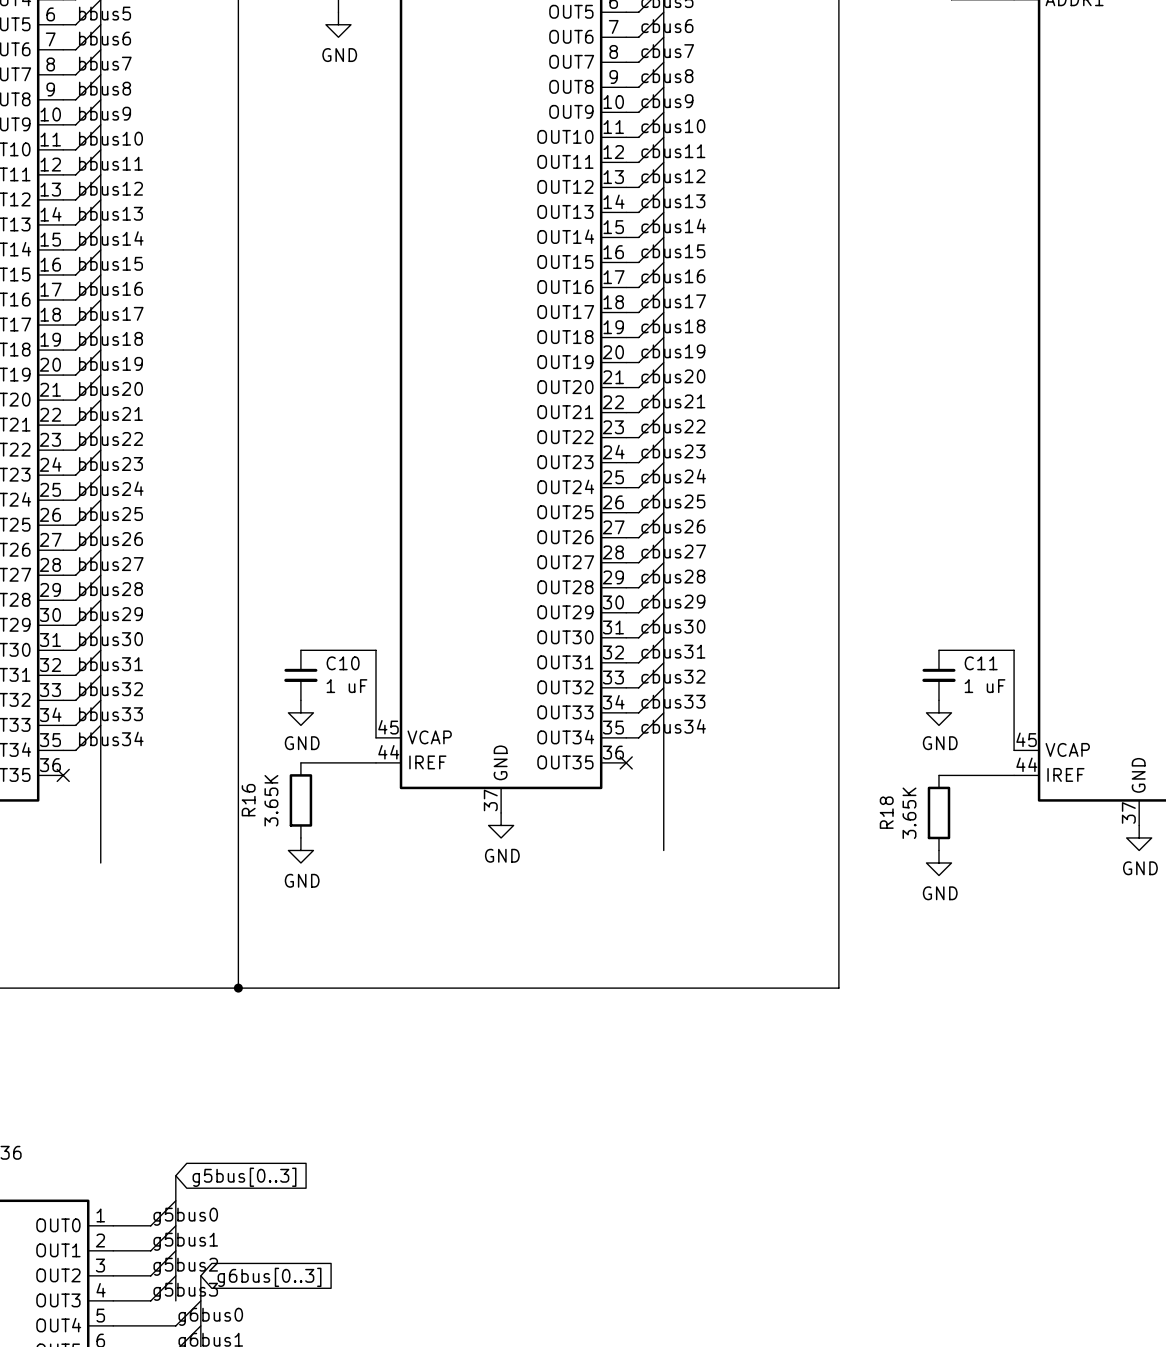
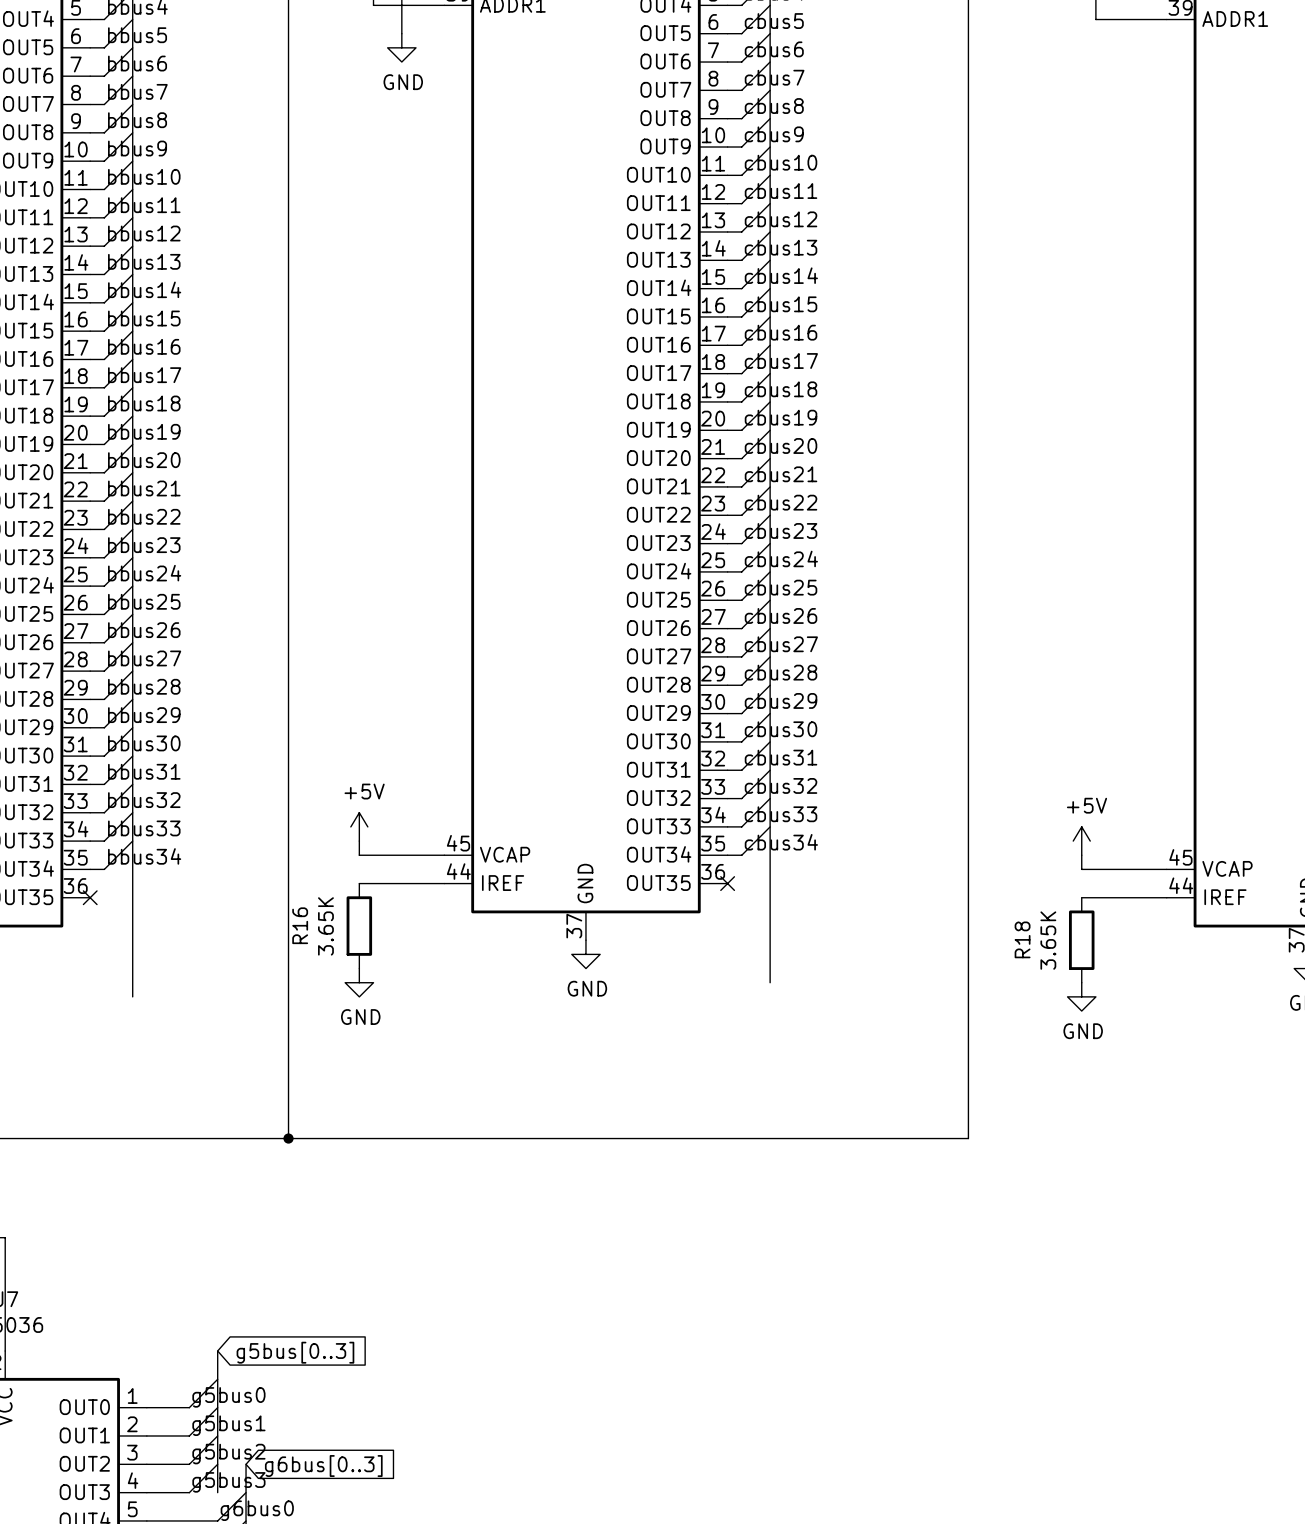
wire: (300, 650) (375, 650) (375, 737) -> (359, 841) (359, 855) (444, 855)
wire: (938, 650) (1014, 650) (1014, 750) -> (1081, 855) (1081, 869) (1166, 869)
C10: 1 uF (300, 675) -> none
C11: 1 uF (938, 675) -> none
power symbol: GND (300, 712) -> +5V (359, 826)
power symbol: GND (938, 712) -> none
power symbol: none -> +5V (1081, 841)

